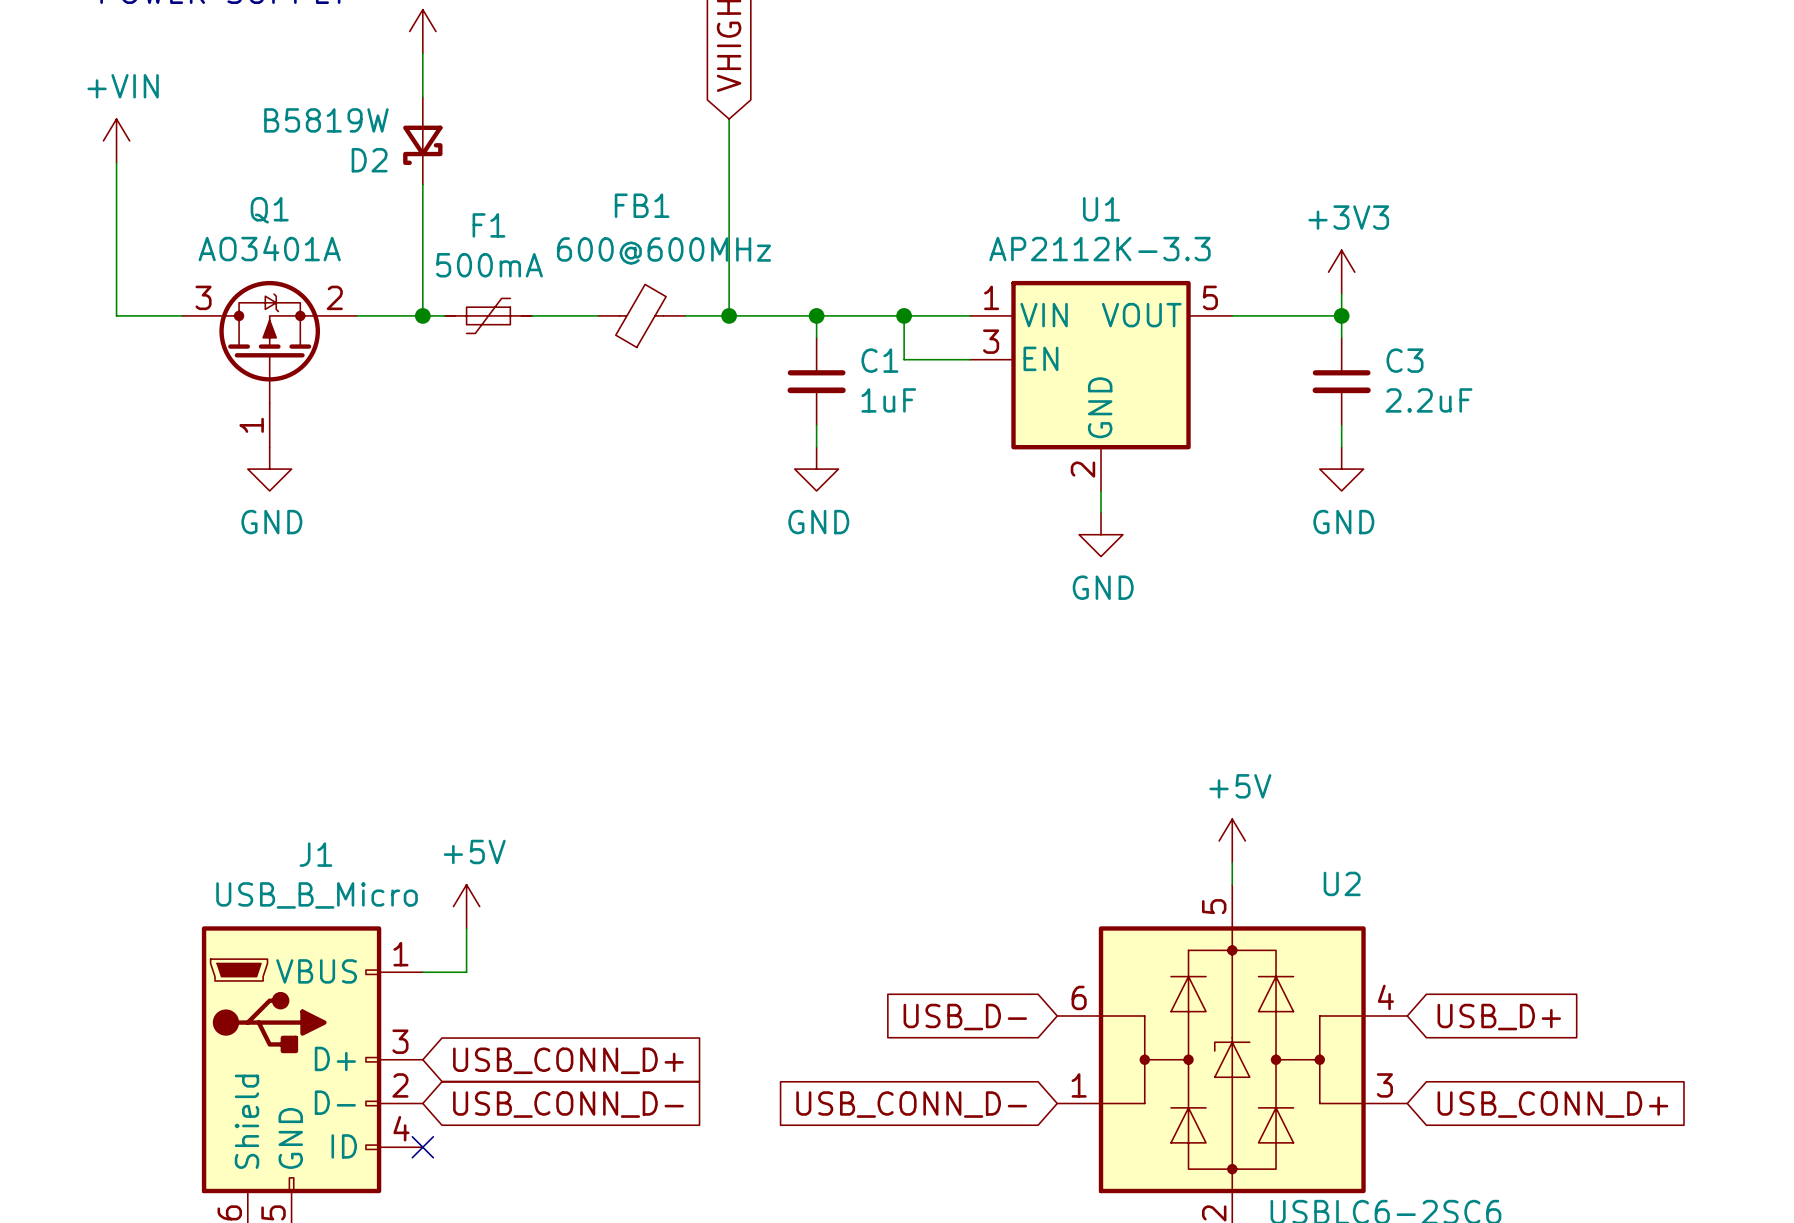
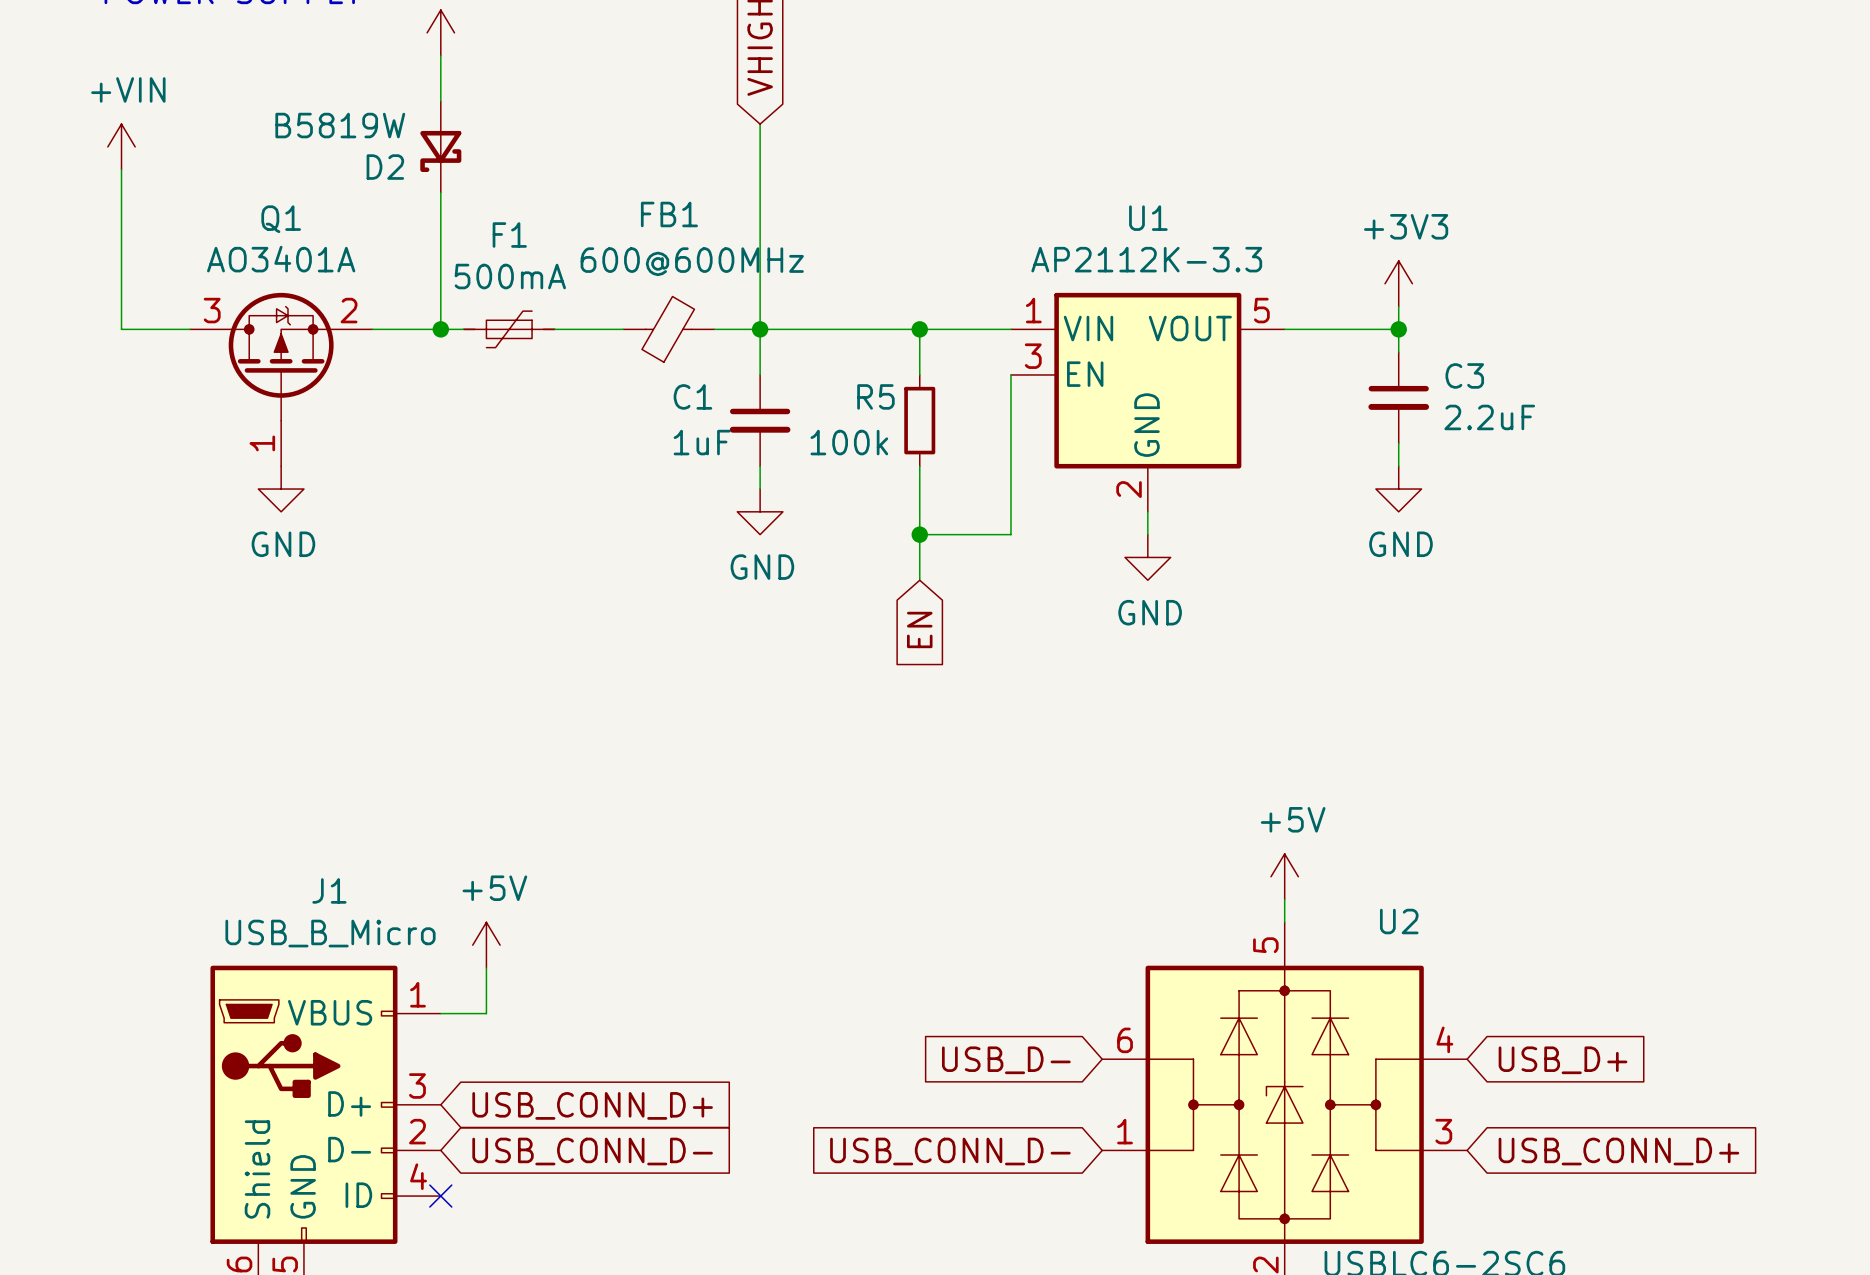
wire: none -> (760, 329) (760, 374)
wire: (816, 315) (816, 337) -> none
junction: (816, 315) -> none
wire: none -> (919, 329) (919, 374)
wire: (904, 315) (904, 359) (969, 359) -> (919, 534) (1010, 534) (1010, 374)
junction position: (904, 315) -> (919, 329)
C1 name position: C1 (879, 360) -> C1 (692, 396)
C1 position: (816, 381) -> (760, 420)
C1 value position: 1uF (888, 400) -> 1uF (702, 442)
R5: none -> 100k (919, 420)
wire: (816, 425) (816, 447) -> (760, 466) (760, 489)
wire: none -> (919, 466) (919, 580)
power symbol position: GND (816, 469) -> GND (760, 511)
junction: none -> (919, 534)
global label: none -> EN (919, 629)

